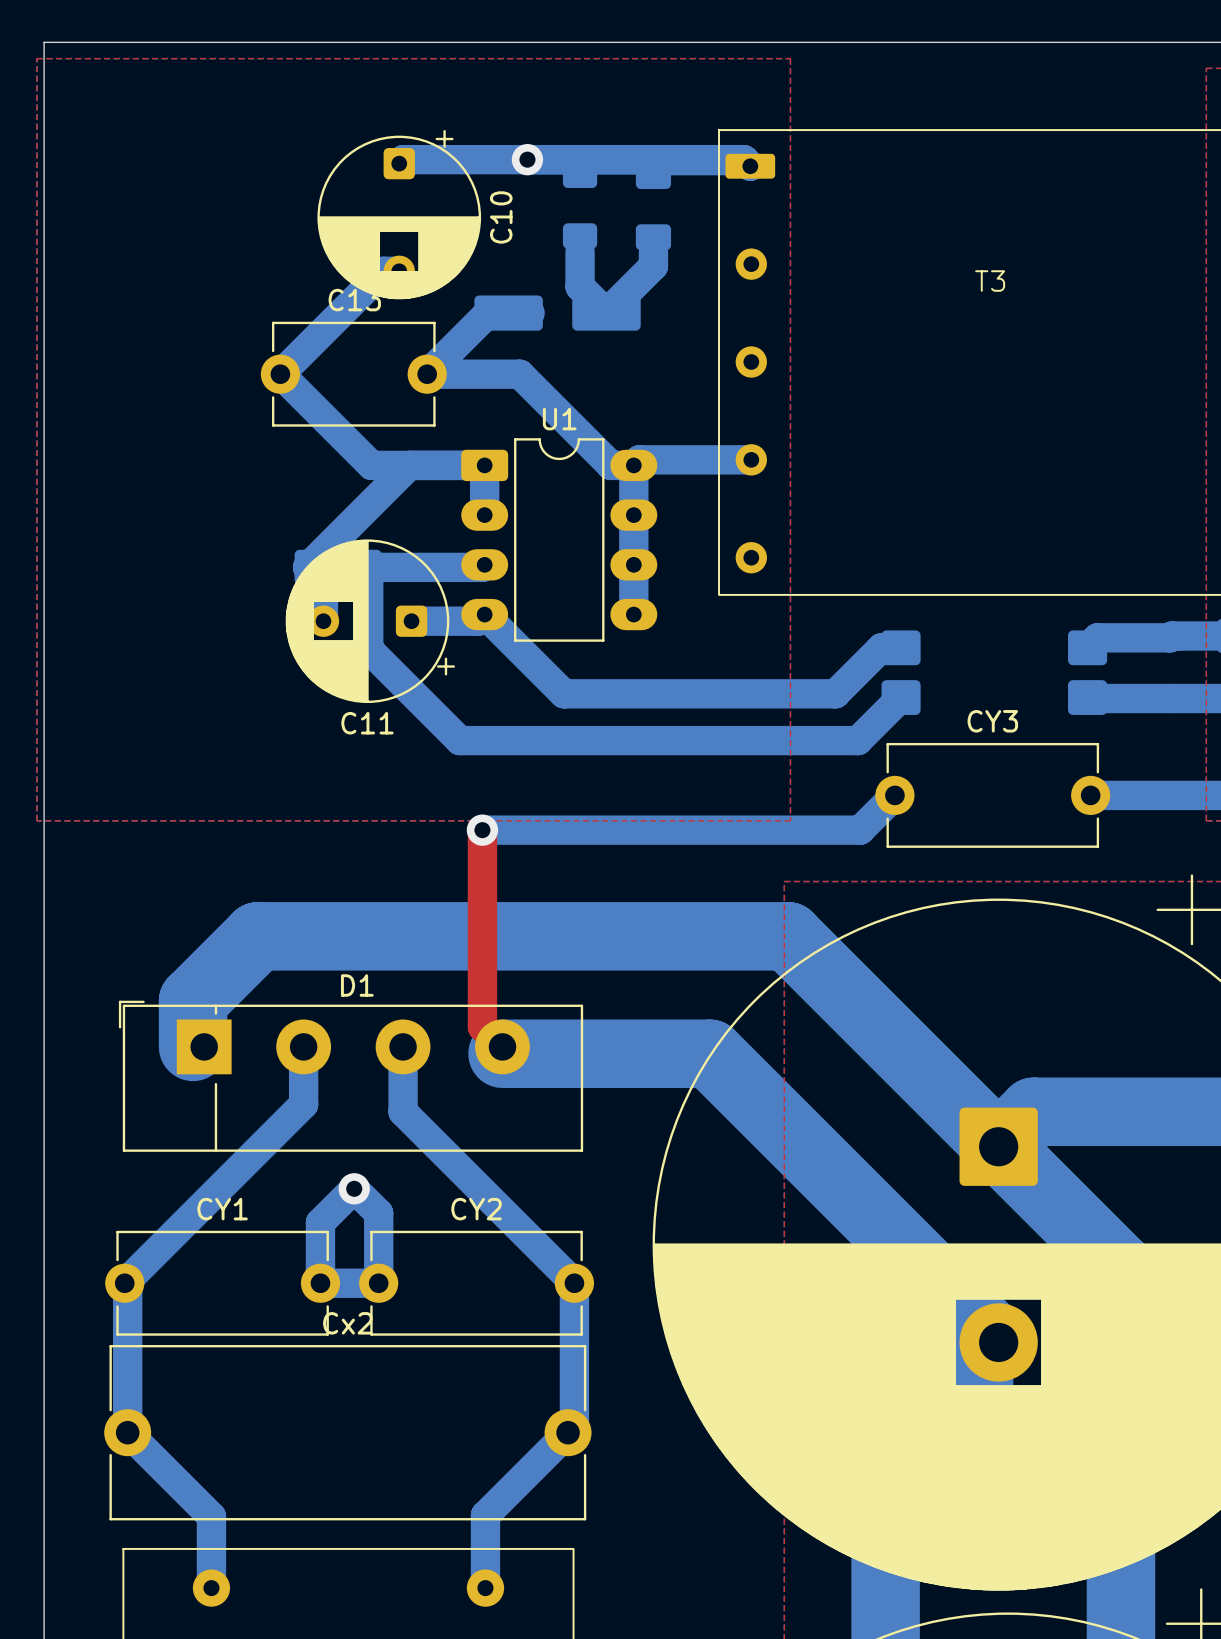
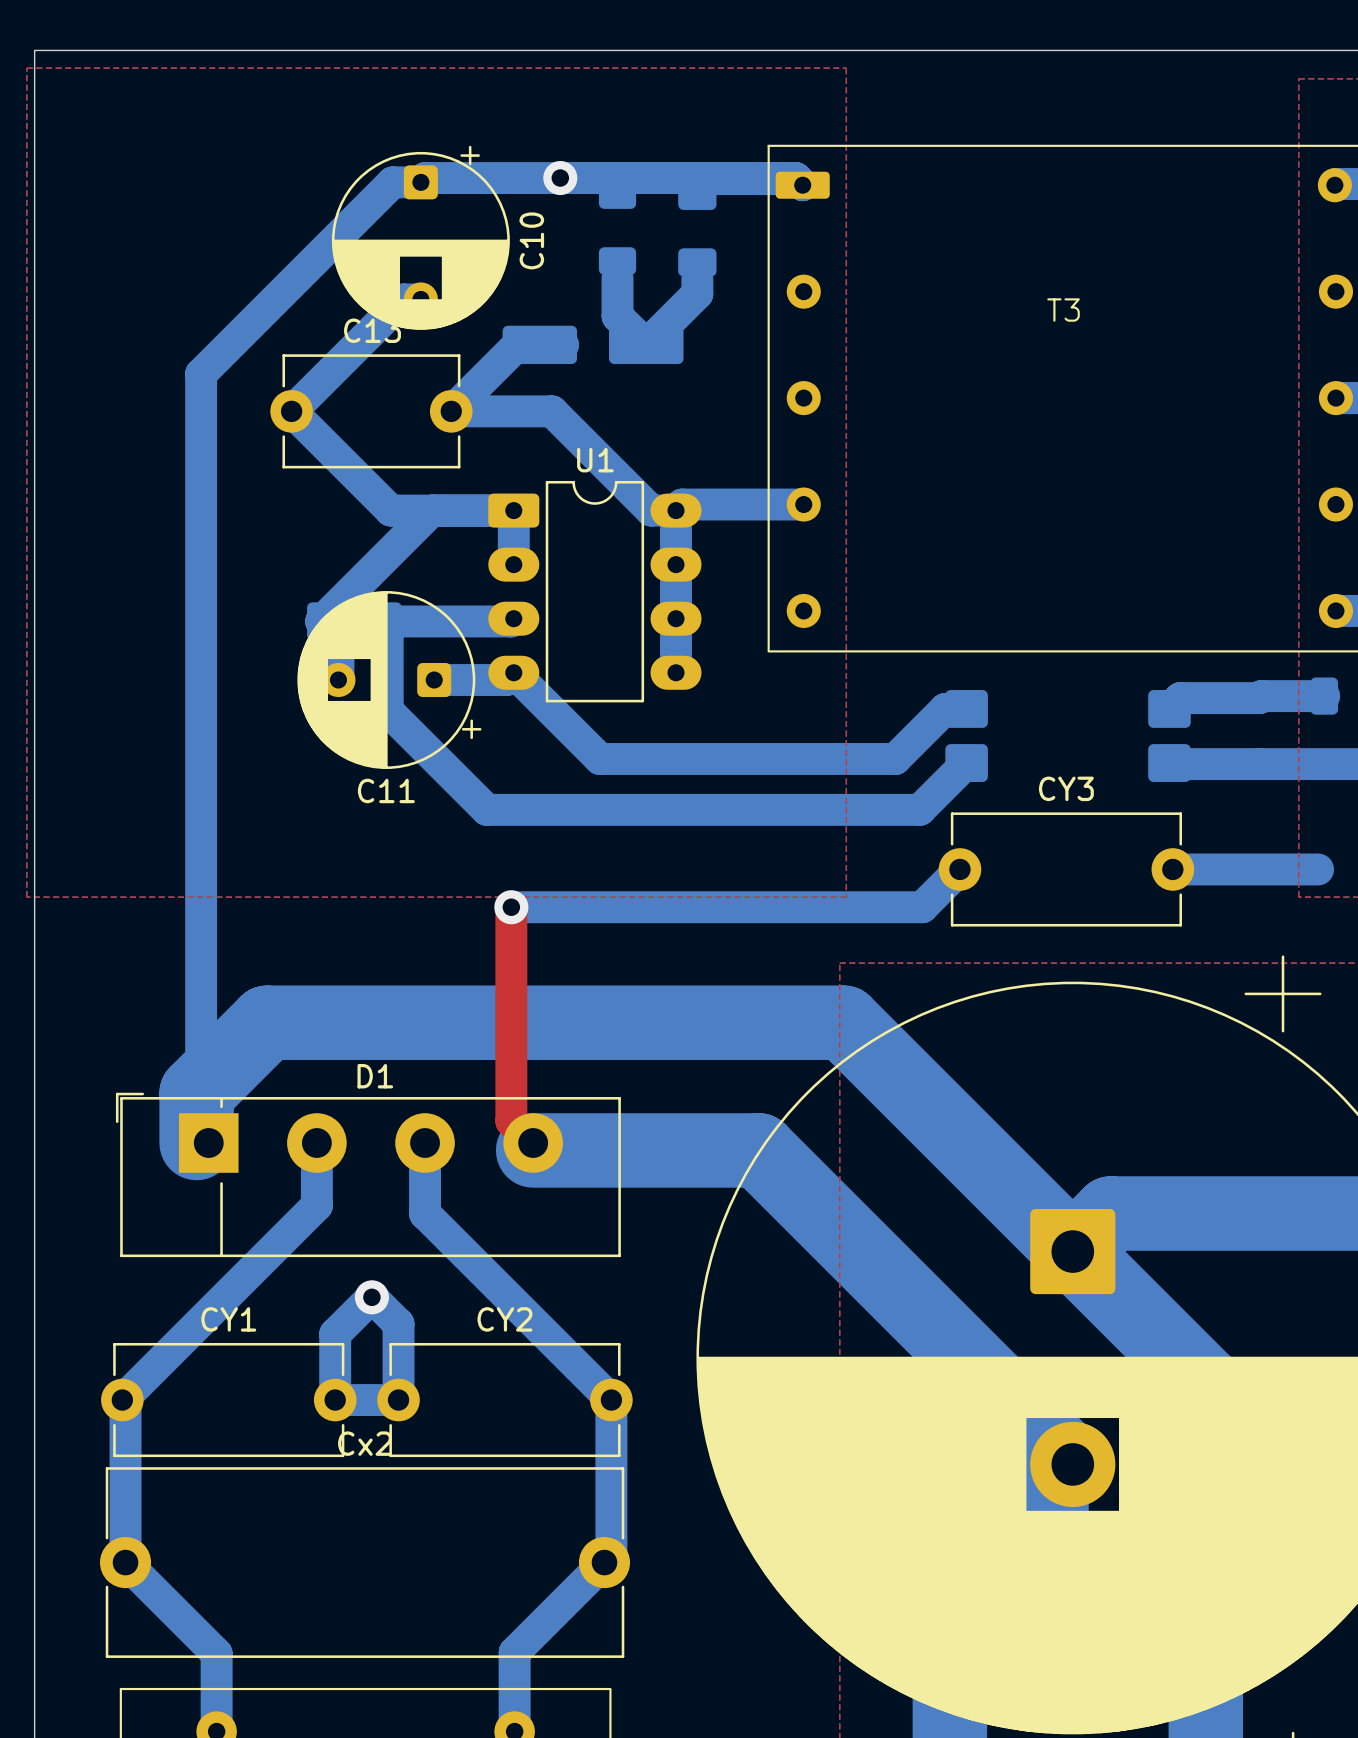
bottom track: none -> (420, 182) (392, 182) (201, 373) (201, 1135) (208, 1143)

